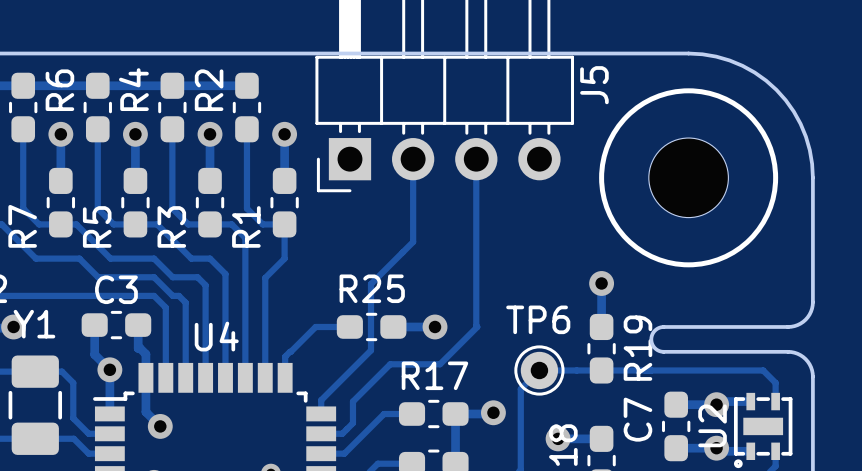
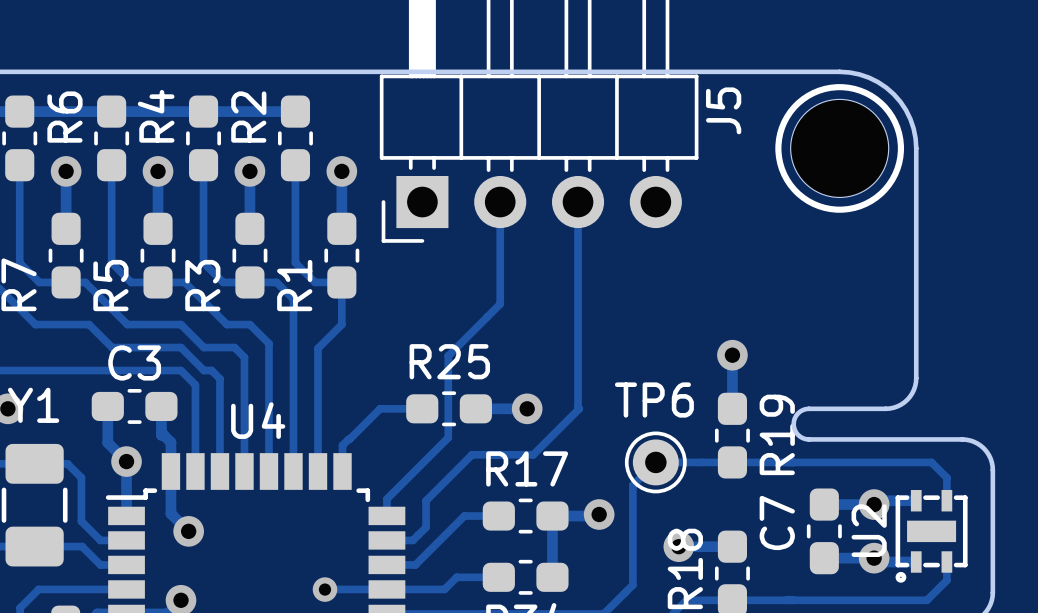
board edge: (688, 53) (716, 56) (742, 65) (766, 80) (776, 89) (793, 111) (800, 123) (805, 136) (812, 163) (812, 302) (809, 314) (800, 323) (791, 326) (725, 326) -> (839, 71) (859, 74) (886, 87) (905, 110) (915, 138) (915, 382) (913, 389) (907, 399) (897, 406) (885, 408)
drawing: none -> [775, 84, 905, 213]
drawing: [599, 88, 779, 268] -> none
part position: (688, 177) -> (839, 148)

